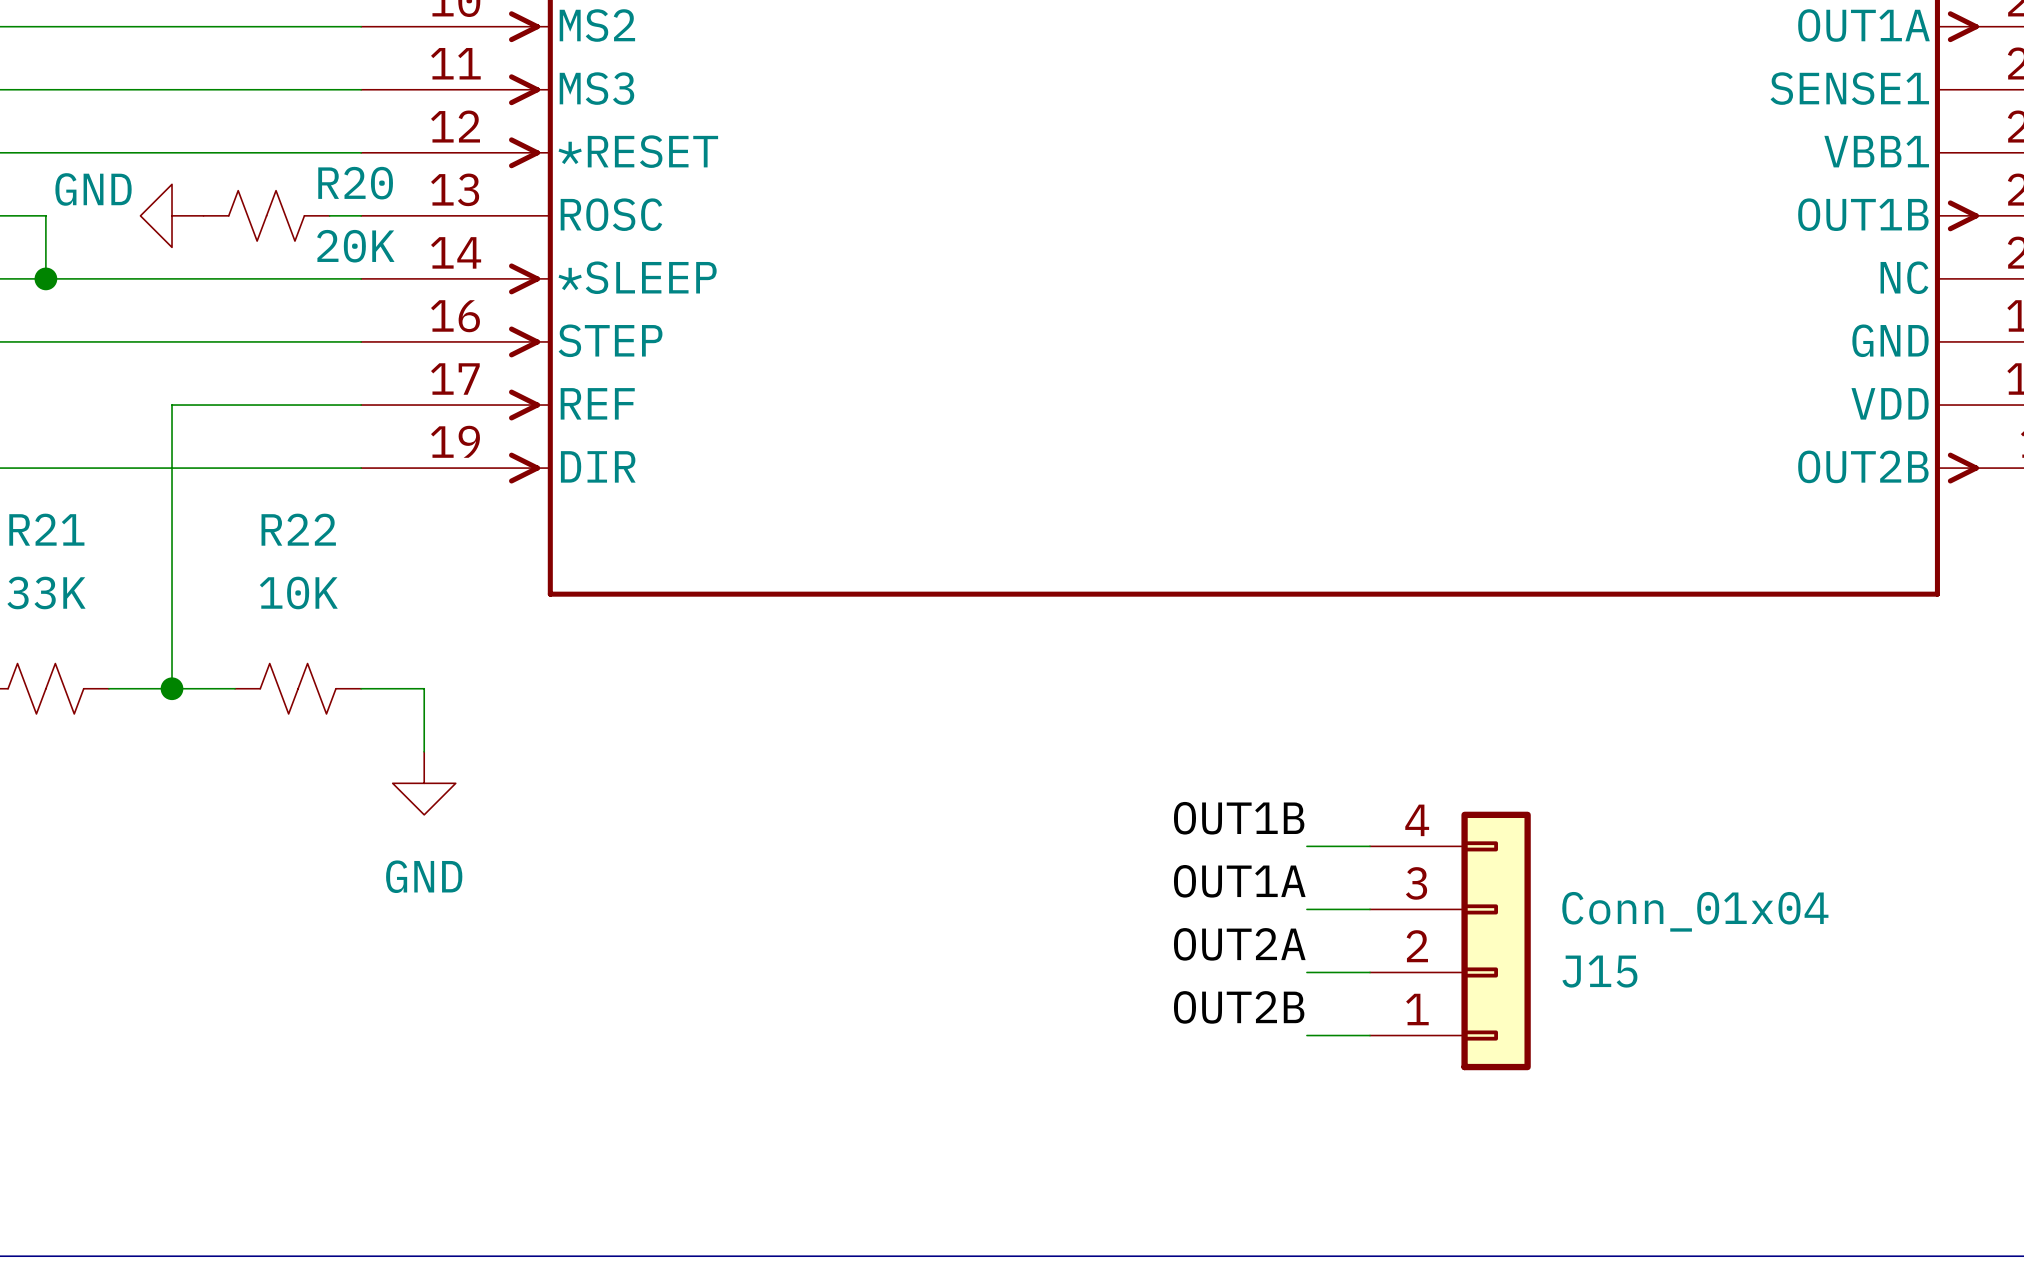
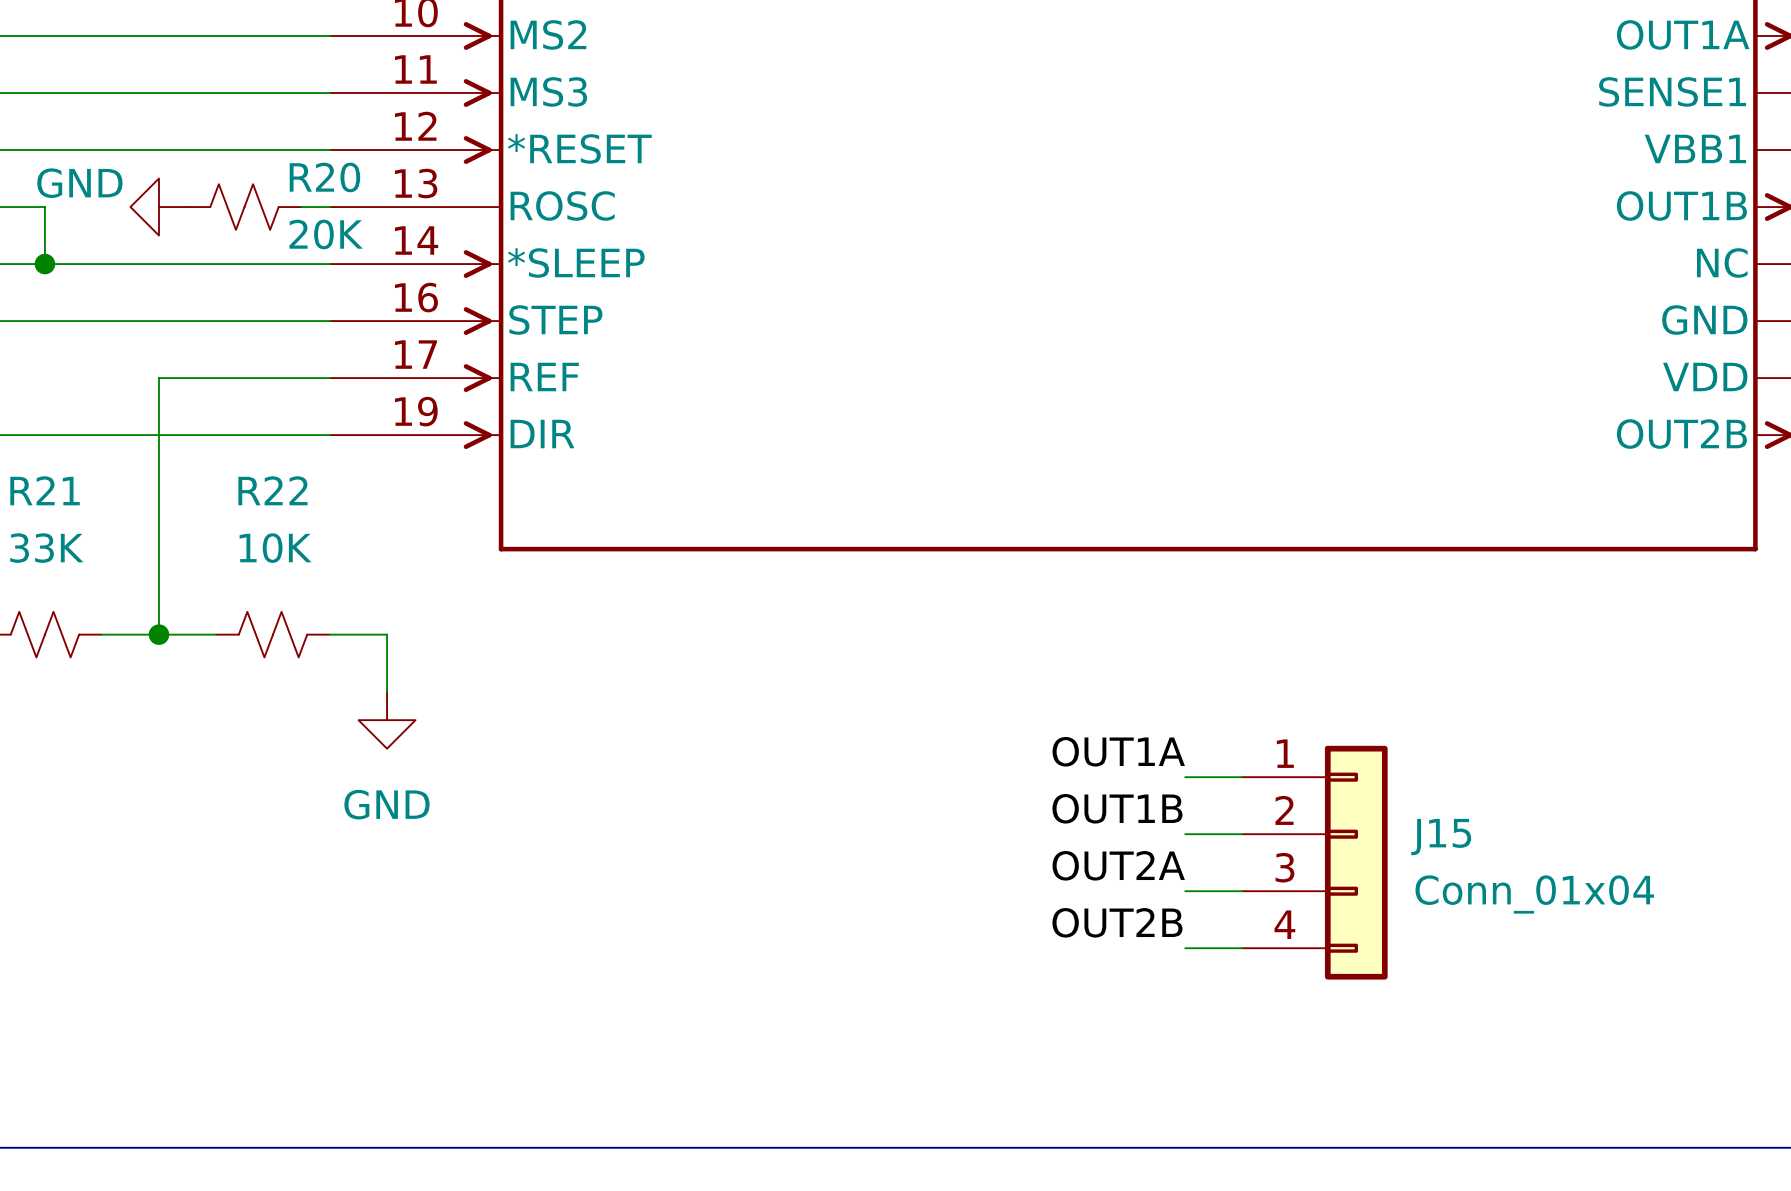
label: OUT1B (1239, 818) -> OUT1A (1118, 751)
label: OUT1A (1239, 881) -> OUT1B (1117, 808)
J15 flip: as is (1496, 940) -> up-down (1356, 862)

